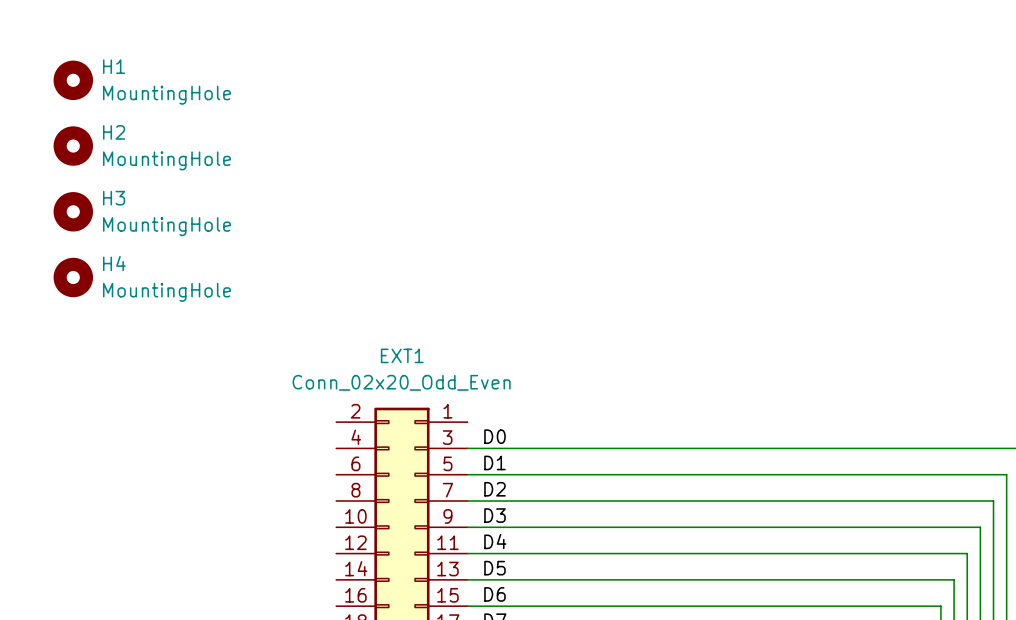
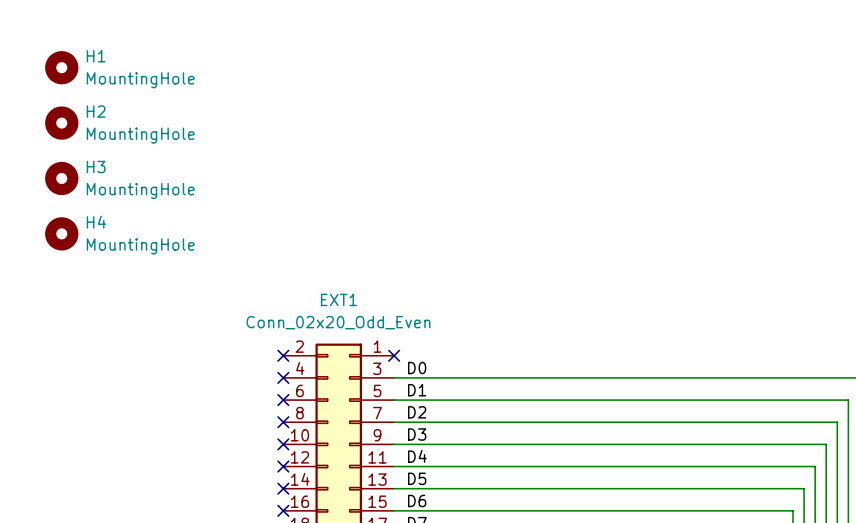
no-connect mark: none -> (283, 355)
no-connect mark: none -> (394, 355)
no-connect mark: none -> (283, 377)
no-connect mark: none -> (283, 400)
no-connect mark: none -> (283, 422)
no-connect mark: none -> (283, 444)
no-connect mark: none -> (283, 466)
no-connect mark: none -> (283, 488)
no-connect mark: none -> (283, 510)

